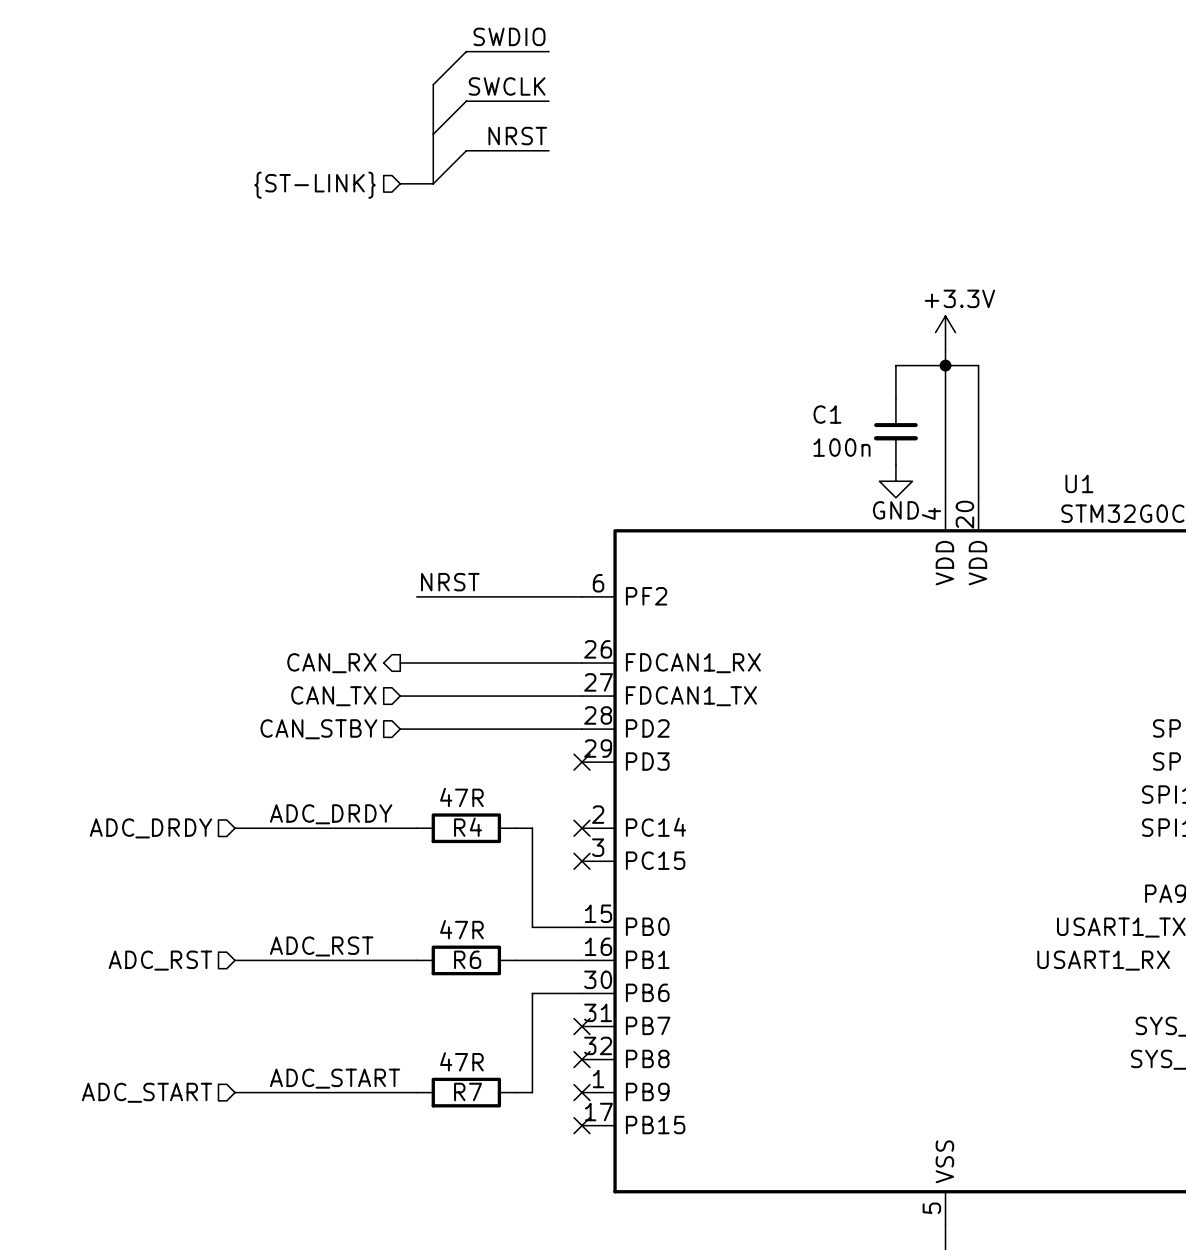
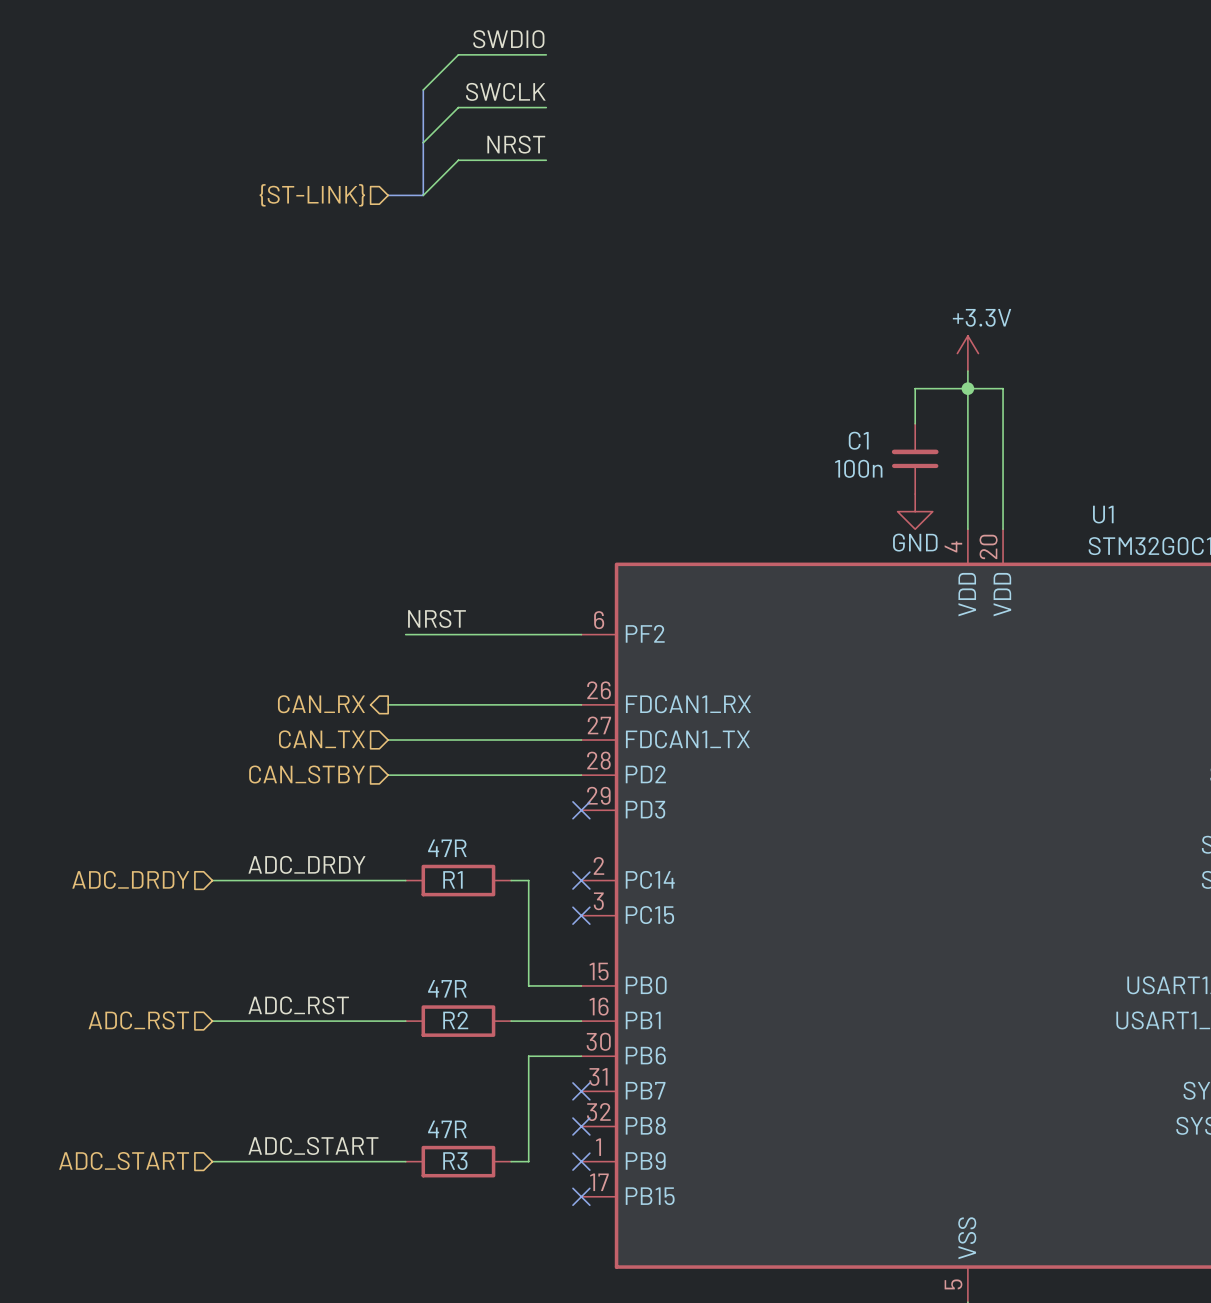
C1 rotation: 0° (895, 431) -> 180° (915, 458)
R4 name: R4 (468, 827) -> R1 (452, 879)
R6 name: R6 (467, 959) -> R2 (455, 1020)
R7 name: R7 (468, 1091) -> R3 (455, 1161)

